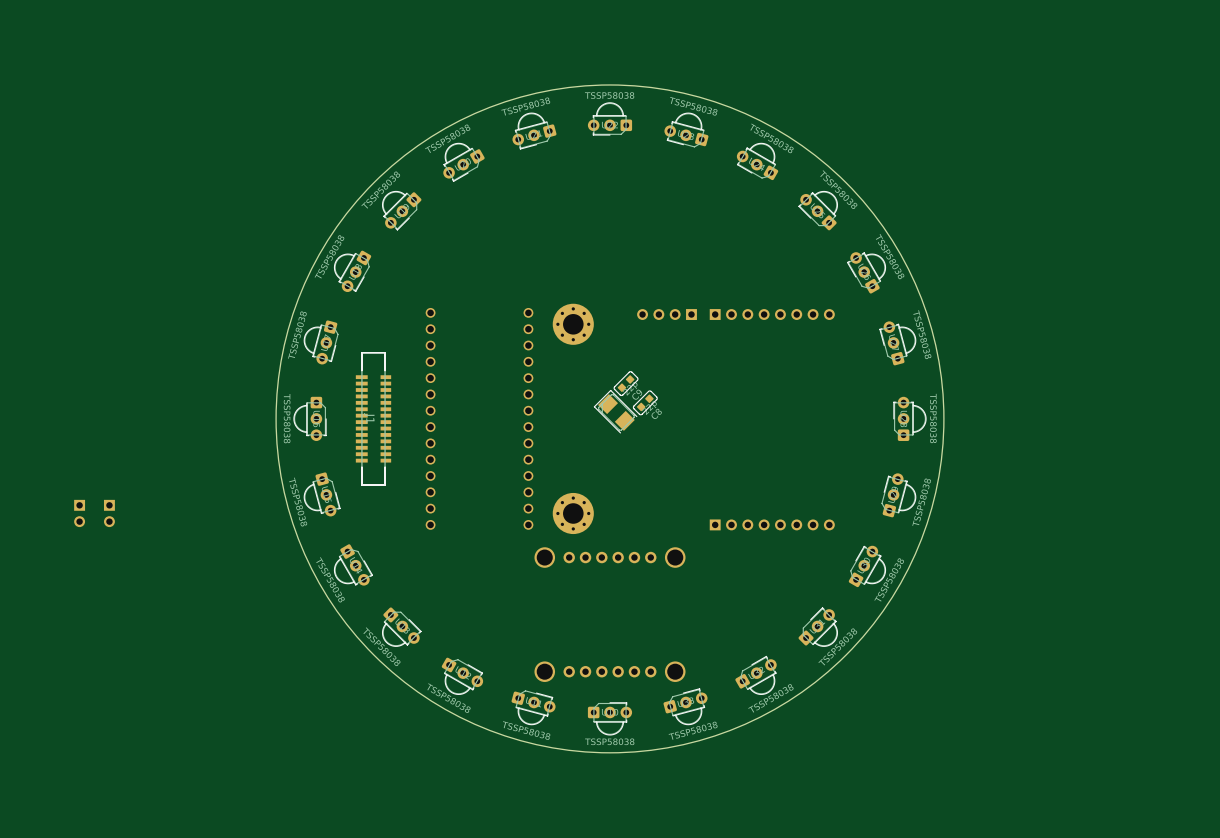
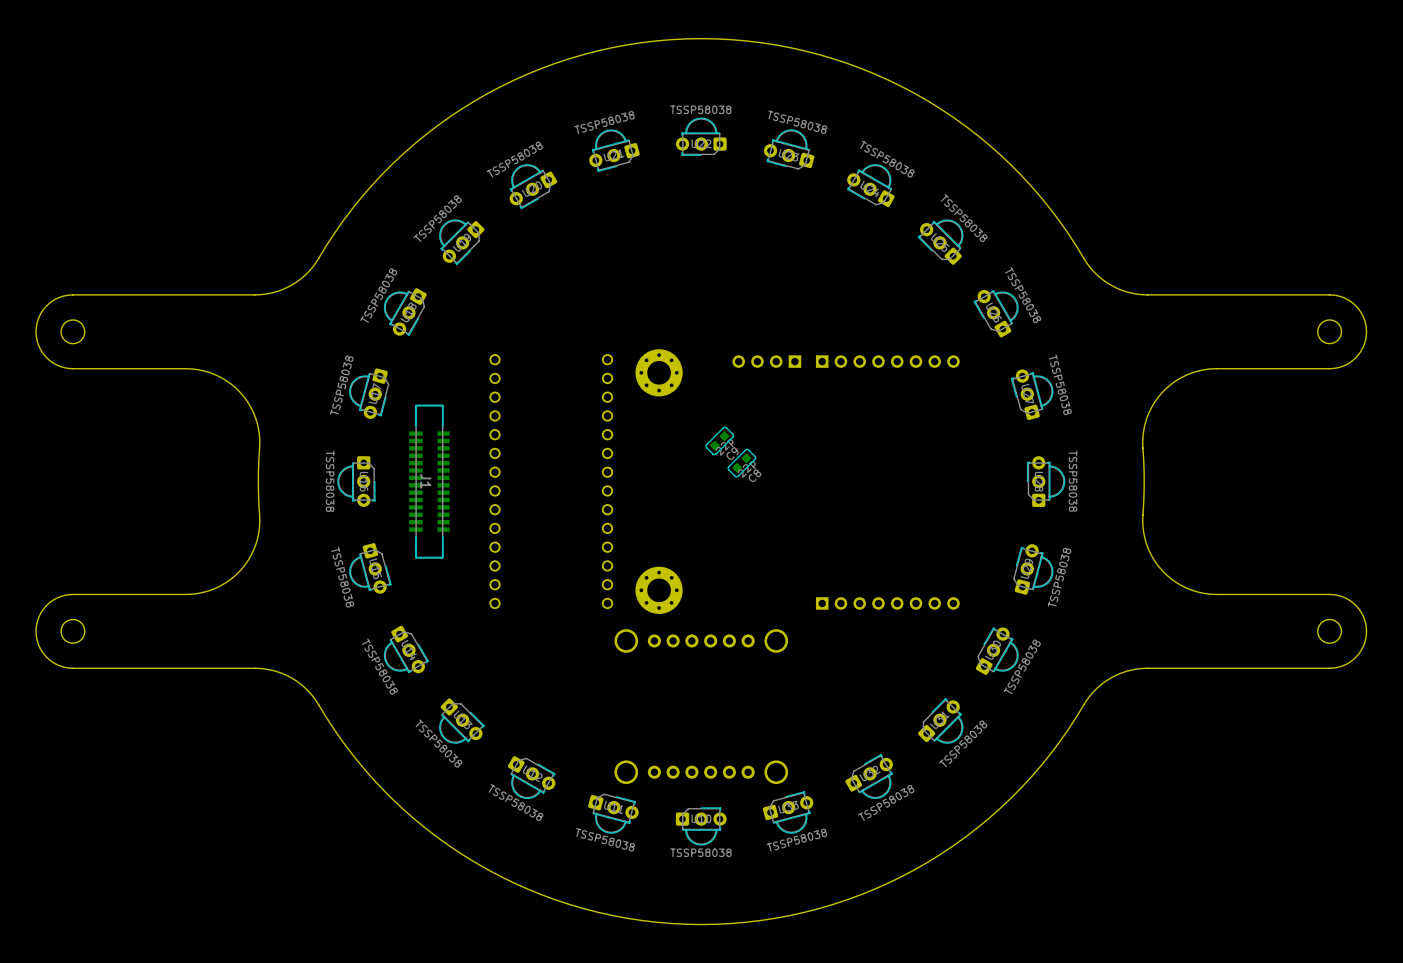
round board edge: [275, 84, 945, 754] -> none
board edge: none -> (1083, 258) (1093, 271) (1106, 282) (1120, 289) (1136, 294) (1333, 295) (1349, 300) (1358, 308) (1365, 323) (1365, 340) (1358, 354) (1341, 366) (1329, 368) (1210, 368) (1187, 374) (1166, 388) (1151, 407) (1143, 429) (1142, 521) (1145, 539) (1154, 561) (1166, 575) (1181, 585) (1210, 594) (1329, 594) (1341, 596) (1355, 605) (1362, 615) (1366, 627) (1364, 643) (1352, 660) (1333, 668) (1147, 668) (1131, 670) (1115, 675) (1093, 691) (1041, 765) (1021, 787) (988, 818) (953, 845) (915, 869) (875, 888) (847, 899) (790, 915) (745, 922) (716, 924) (686, 924) (641, 920) (597, 912) (569, 904) (527, 888) (500, 876) (461, 854) (425, 828) (391, 798) (371, 777) (343, 742) (312, 695) (300, 684) (286, 675) (271, 670) (254, 668) (68, 668) (49, 660) (38, 643) (36, 627) (39, 615) (46, 605) (60, 596) (72, 594) (192, 594) (220, 585) (235, 575) (247, 561) (255, 544) (259, 521) (258, 429) (250, 407) (235, 388) (215, 374) (192, 368) (72, 368) (60, 366) (46, 357) (38, 343) (36, 323) (44, 308) (56, 298) (68, 295) (254, 294) (271, 293) (286, 287) (308, 271) (361, 197) (381, 175) (413, 144) (449, 117) (487, 93) (527, 74) (555, 63) (597, 50) (641, 42) (686, 38) (716, 38) (745, 40) (790, 47) (833, 58) (861, 68) (902, 86) (928, 101) (953, 117) (988, 144) (1021, 175) (1041, 197) (1059, 220) (1083, 258)
round board edge: none -> [60, 319, 86, 344]
round board edge: none -> [1317, 319, 1342, 344]
part: (615, 411) -> none
part: (79, 513) -> none
part: (109, 513) -> none
round board edge: none -> [60, 619, 86, 644]
round board edge: none -> [1317, 619, 1342, 644]

